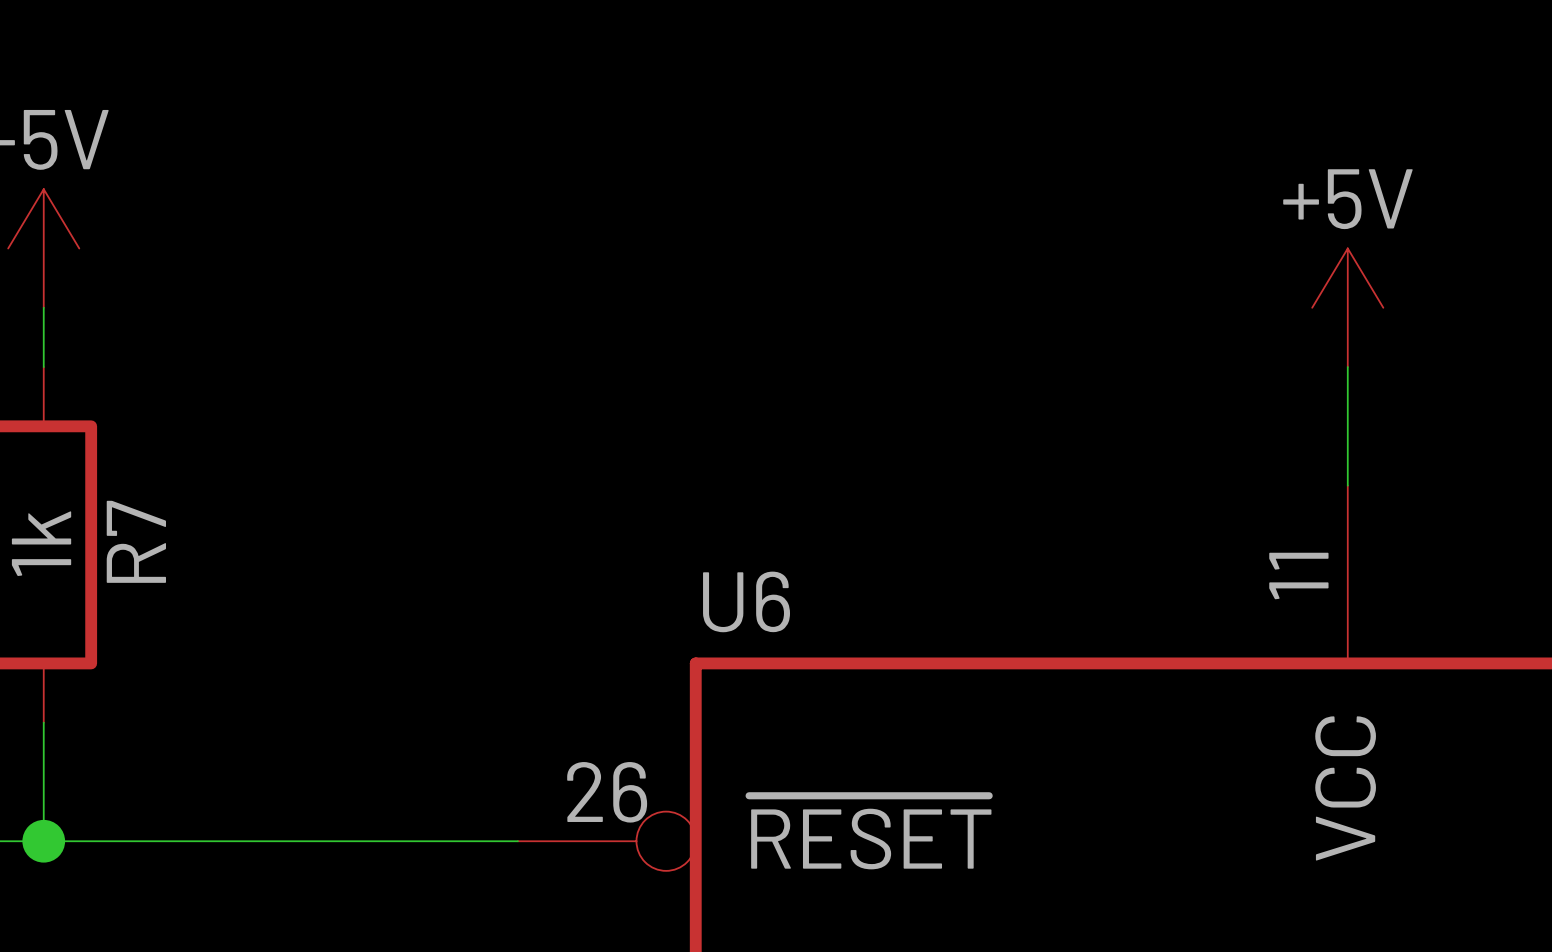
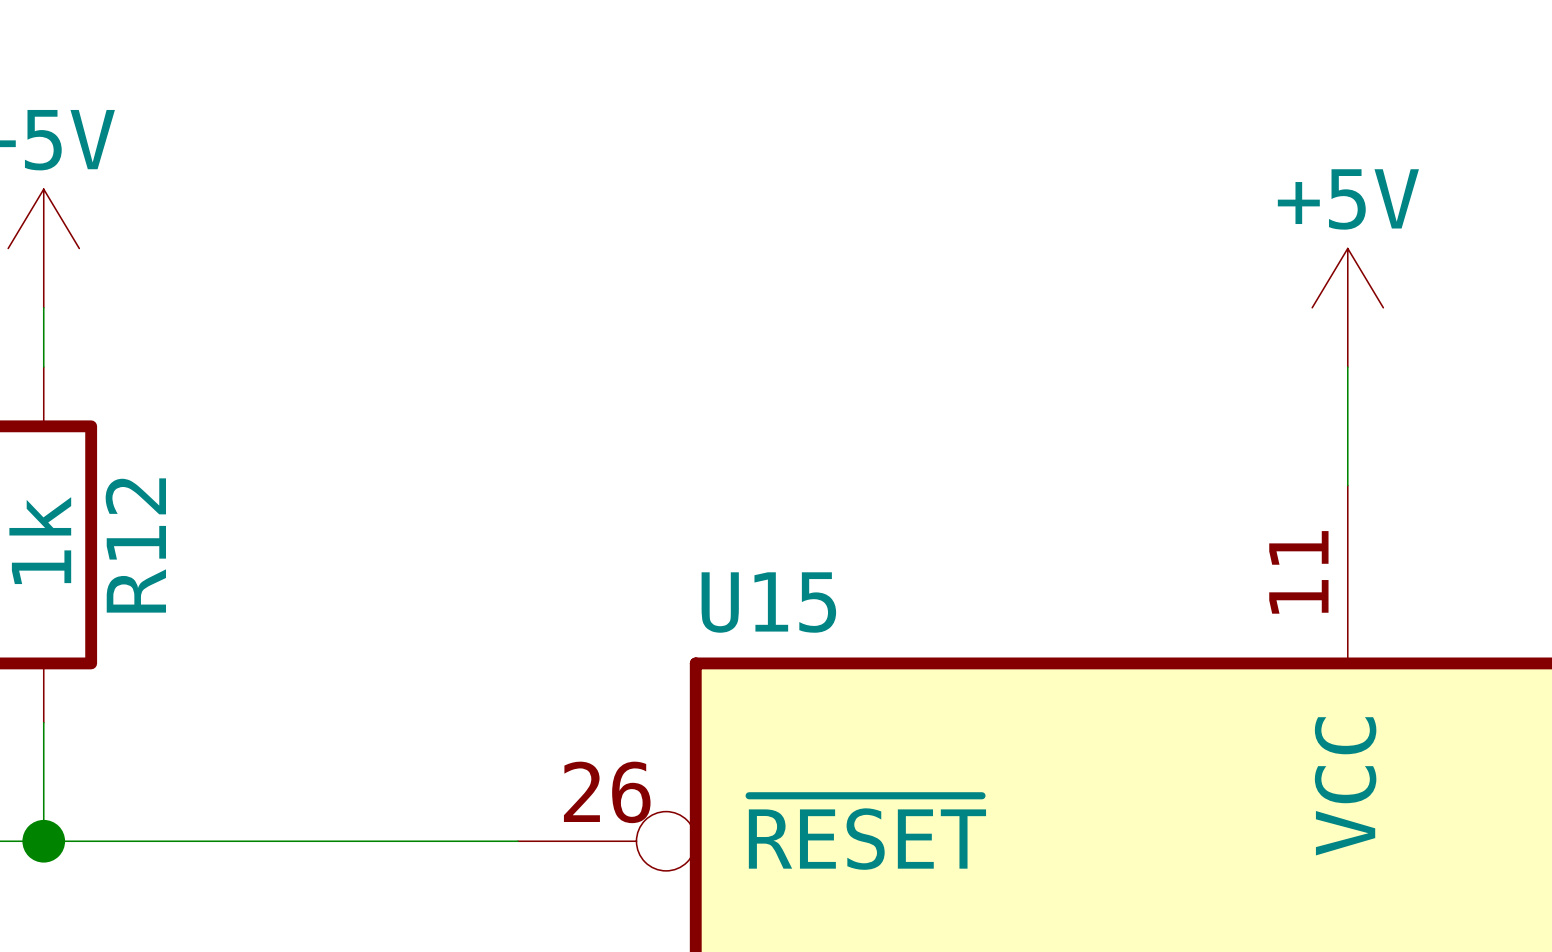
R7 name: R7 (136, 541) -> R12 (135, 545)
U6 name: U6 (746, 601) -> U15 (768, 602)

